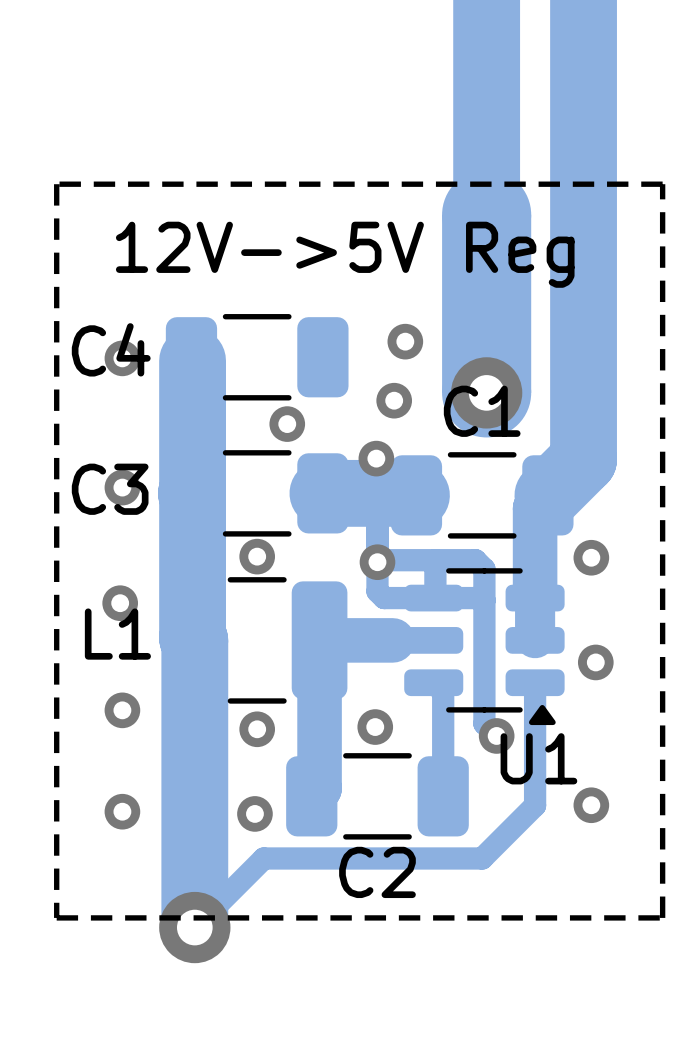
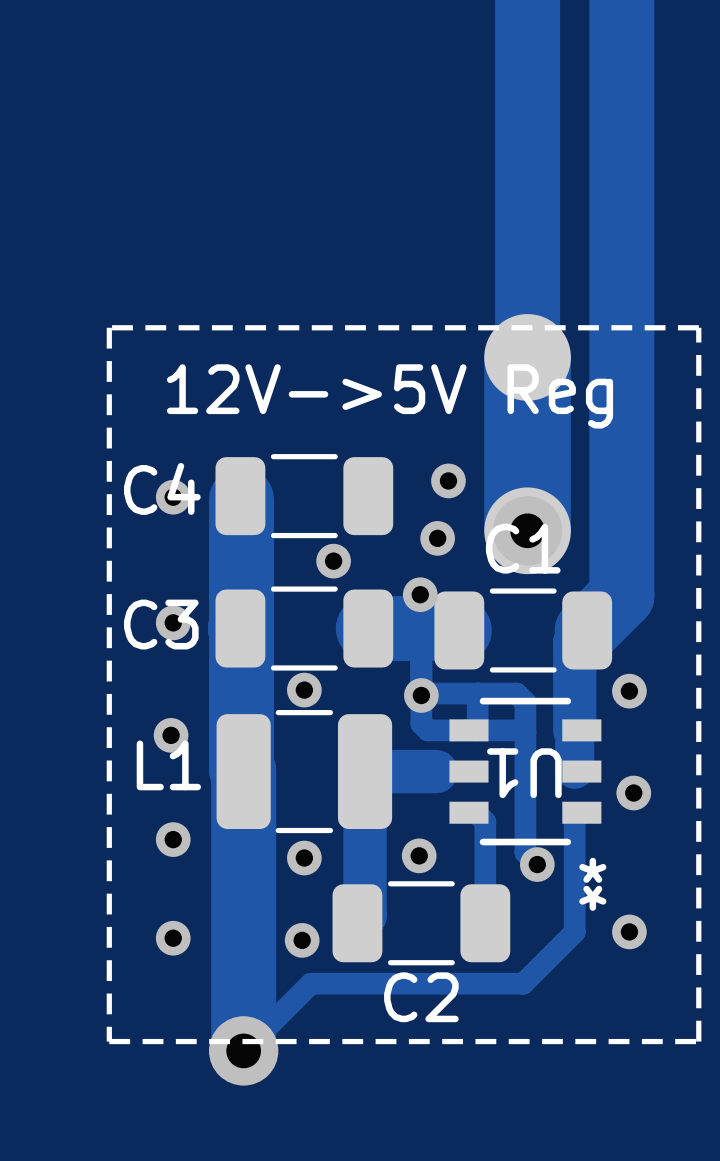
U1 footprint: [404, 568, 565, 726] -> [449, 697, 602, 846]
U1 name position: U1 (538, 758) -> U1 (524, 773)

